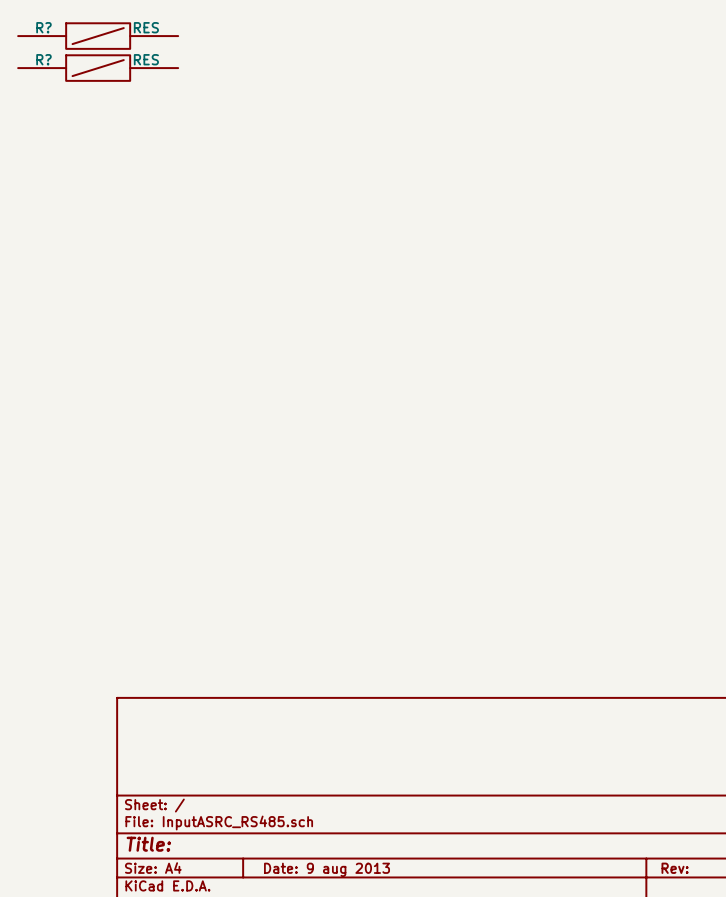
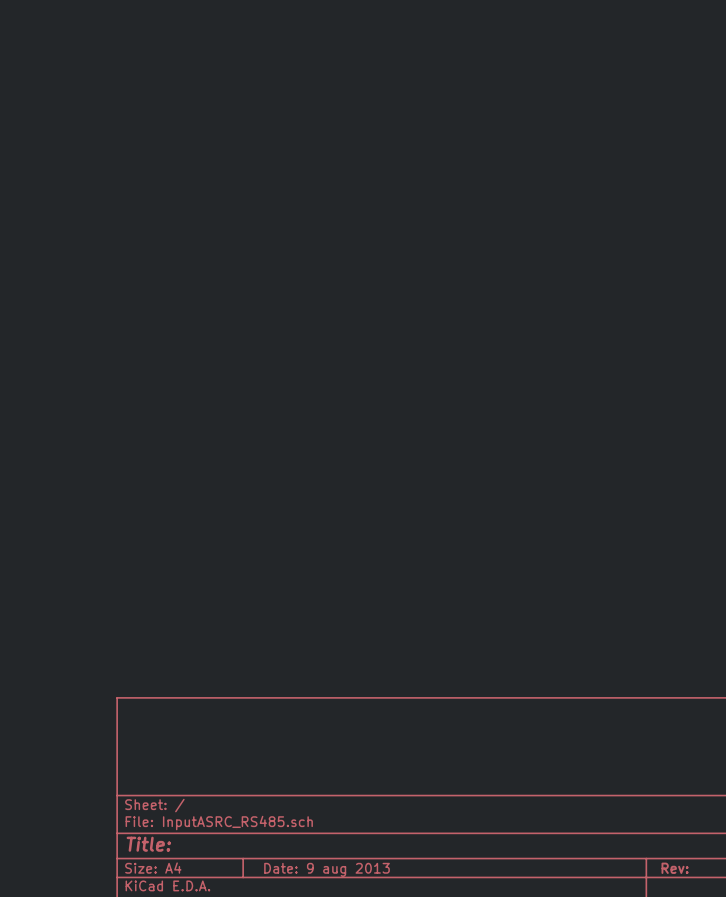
R?: RES (98, 36) -> none
R?: RES (98, 68) -> none

